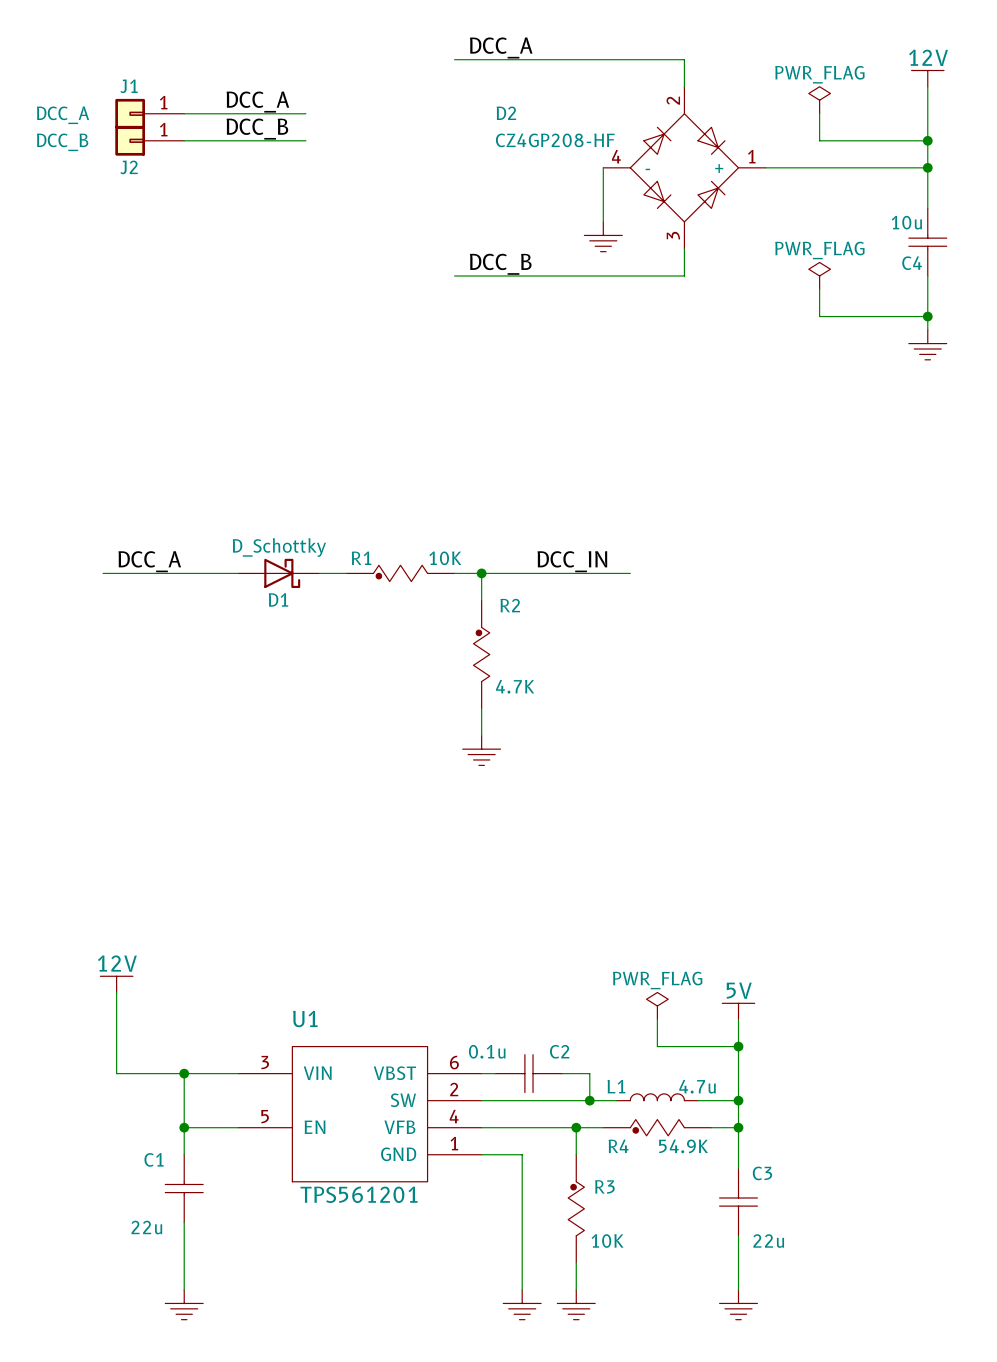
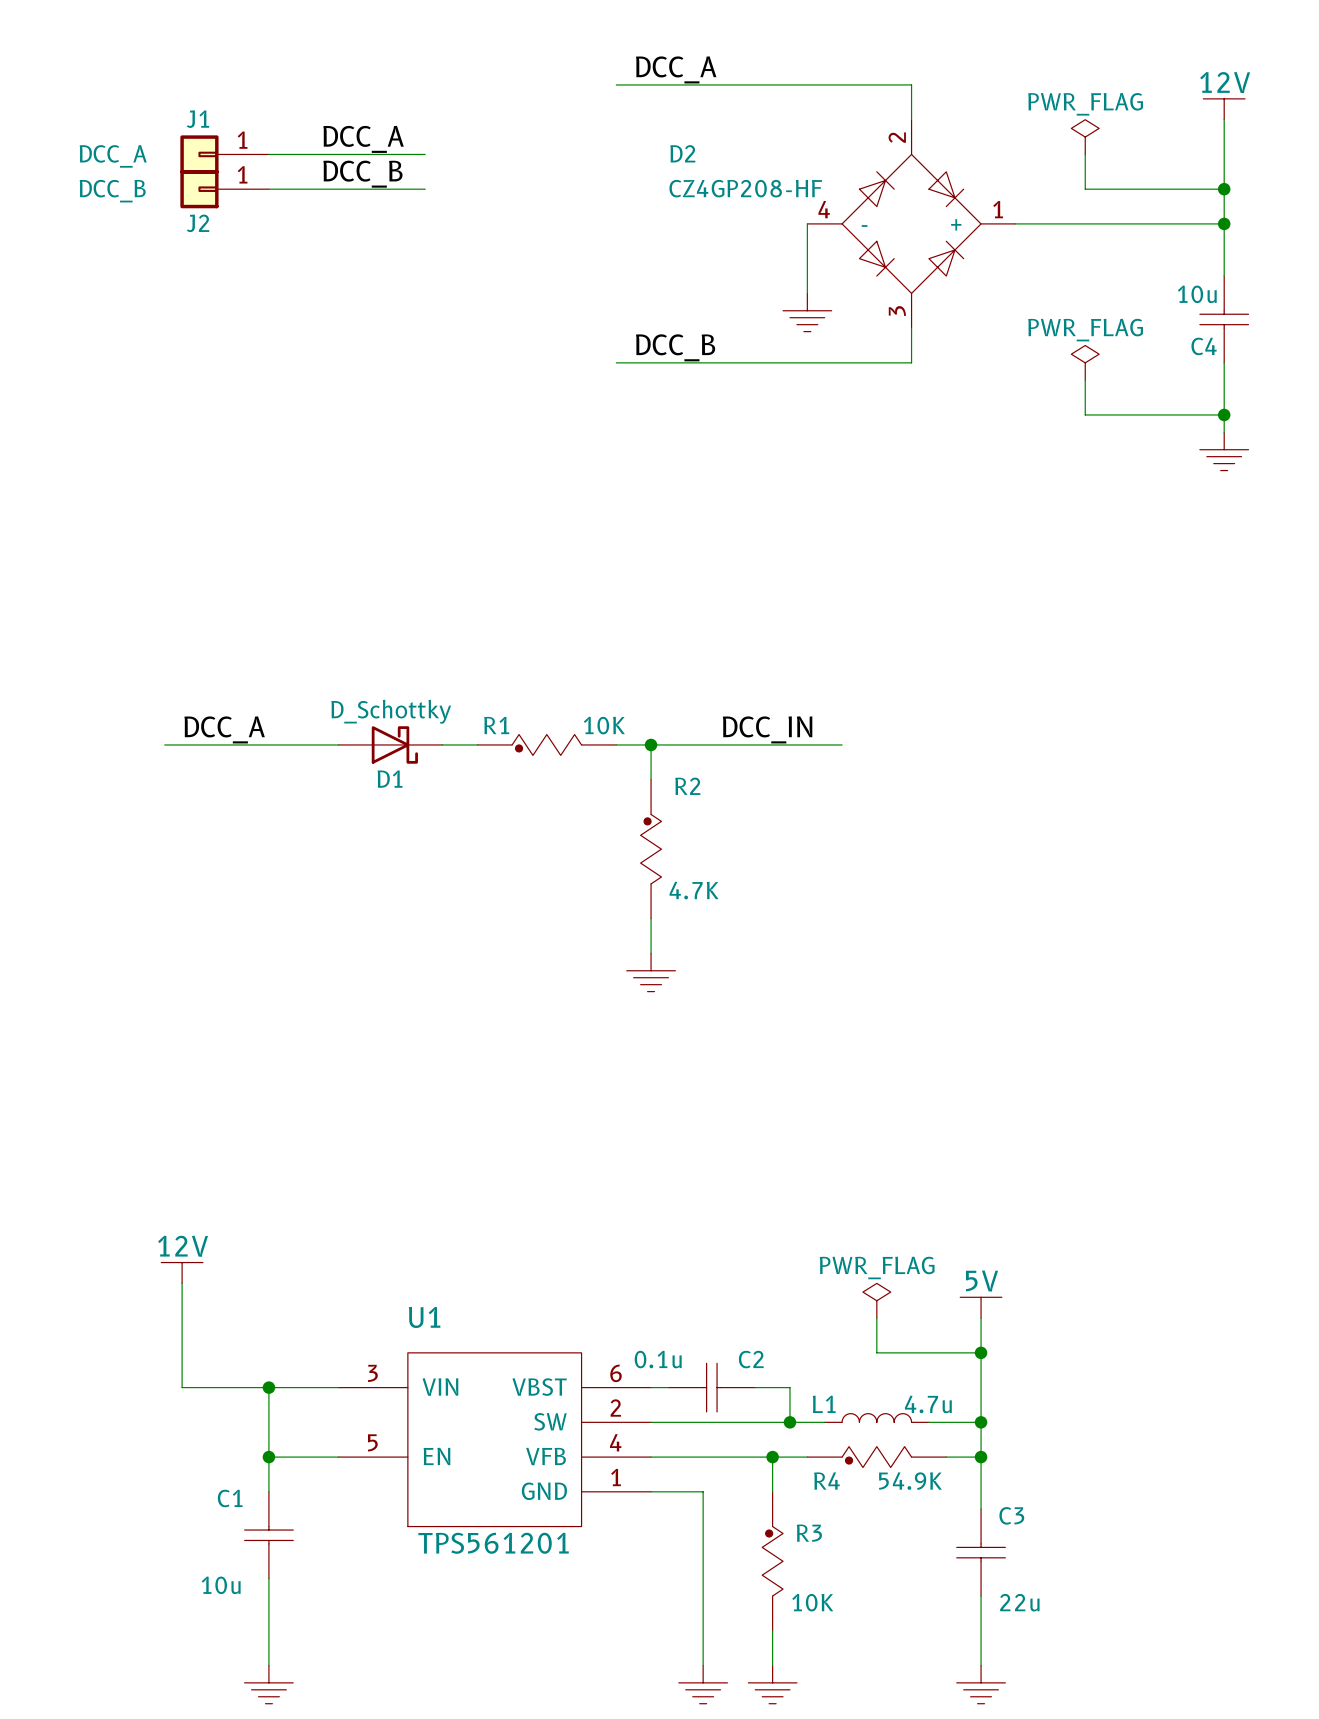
C1 value: 22u (146, 1227) -> 10u (221, 1585)

